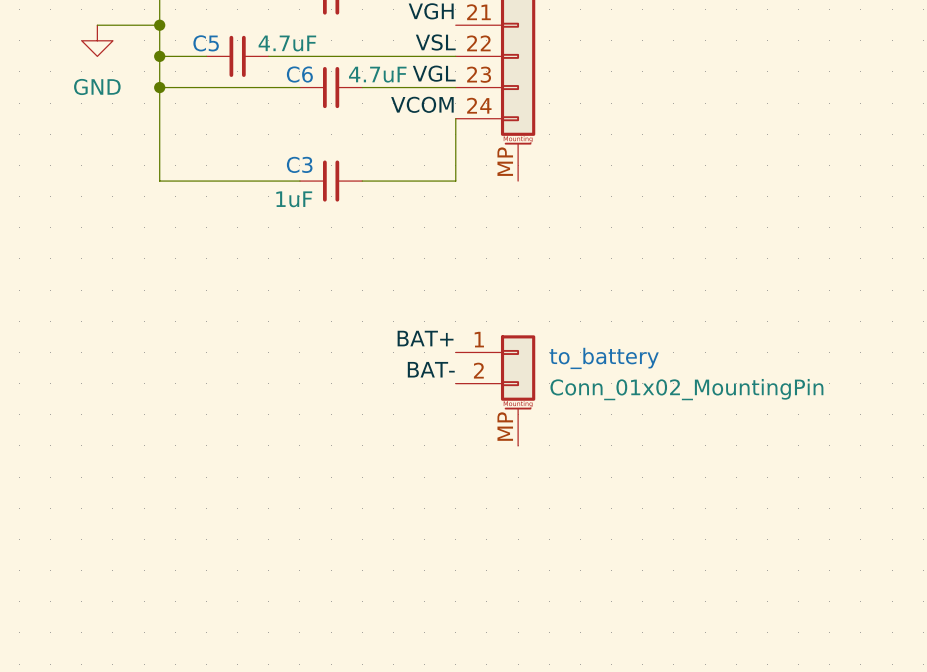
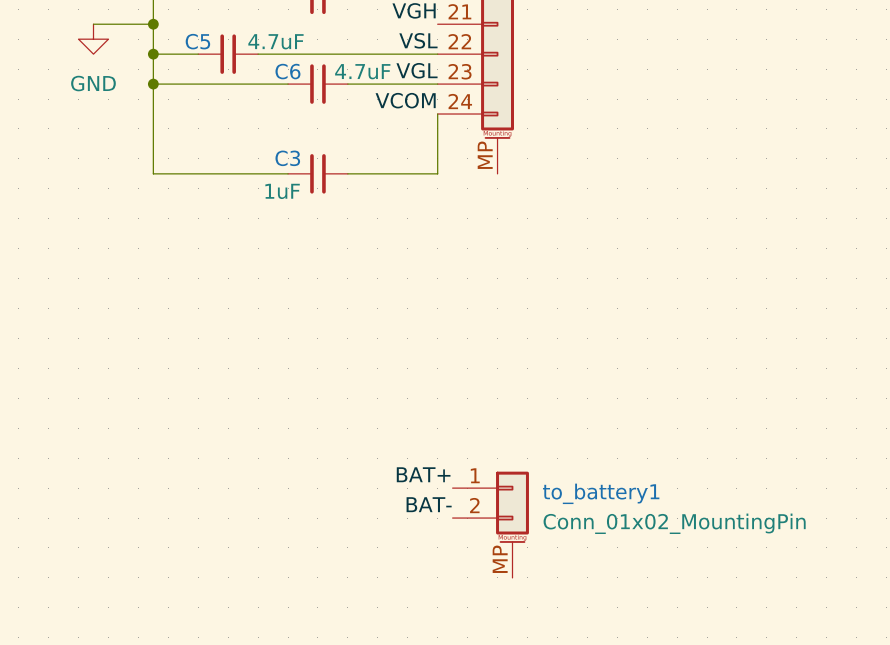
label position: BAT+ (425, 338) -> BAT+ (423, 474)
label position: BAT- (431, 369) -> BAT- (429, 504)
to_battery: Conn_01x02_MountingPin (495, 390) -> none
to_battery1: none -> Conn_01x02_MountingPin (490, 524)

